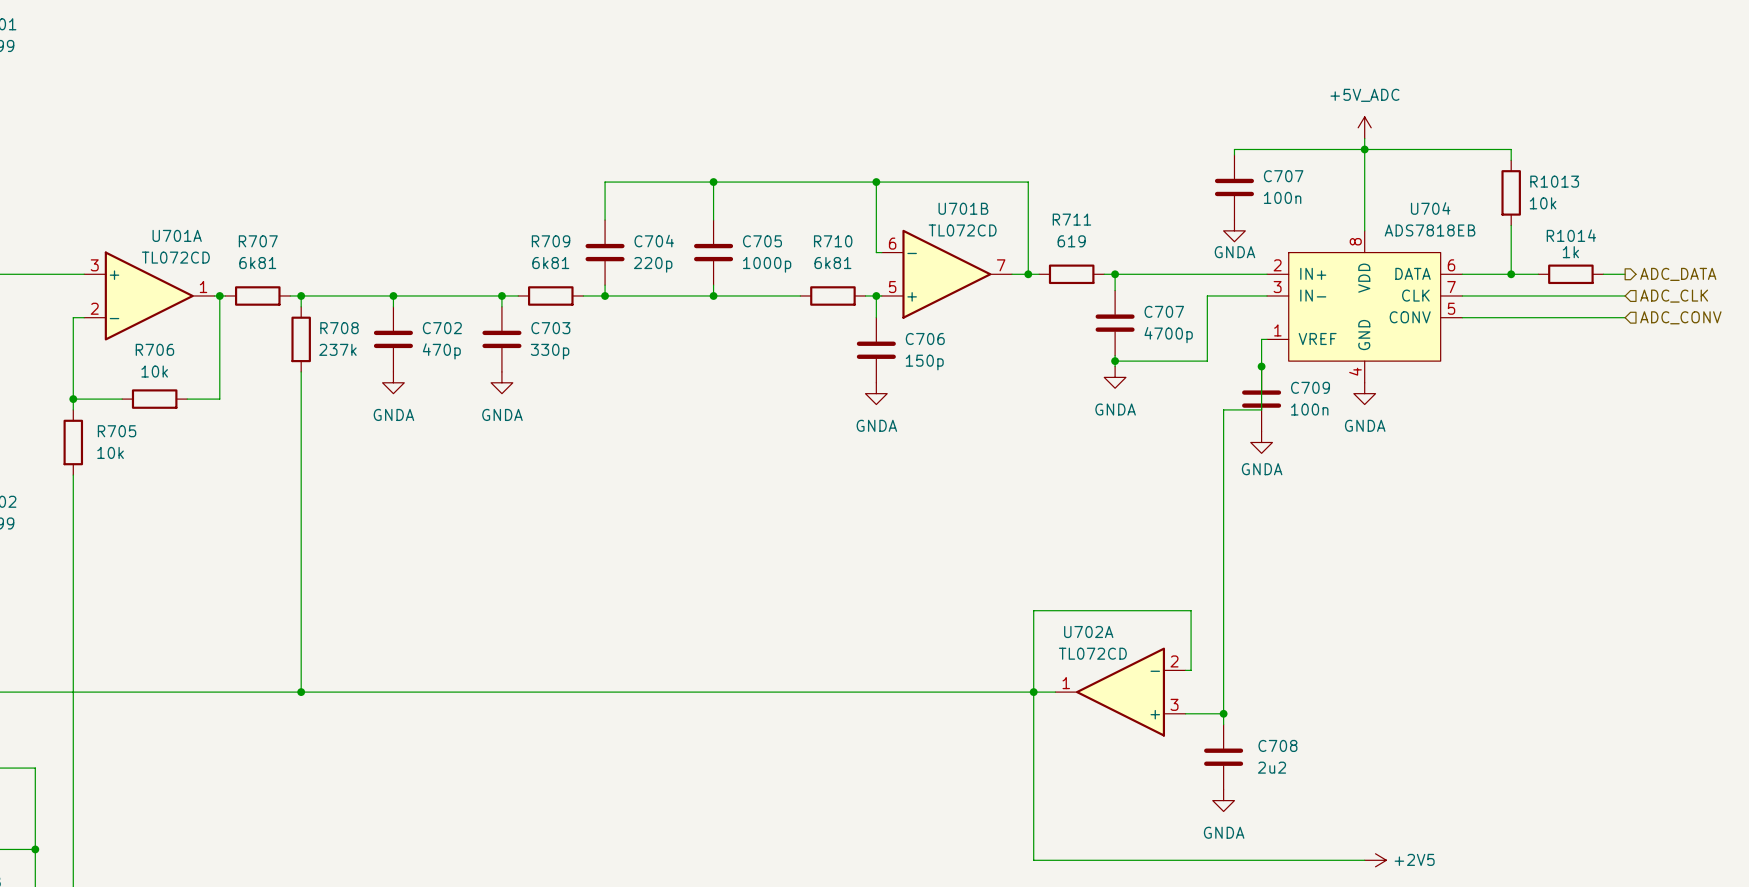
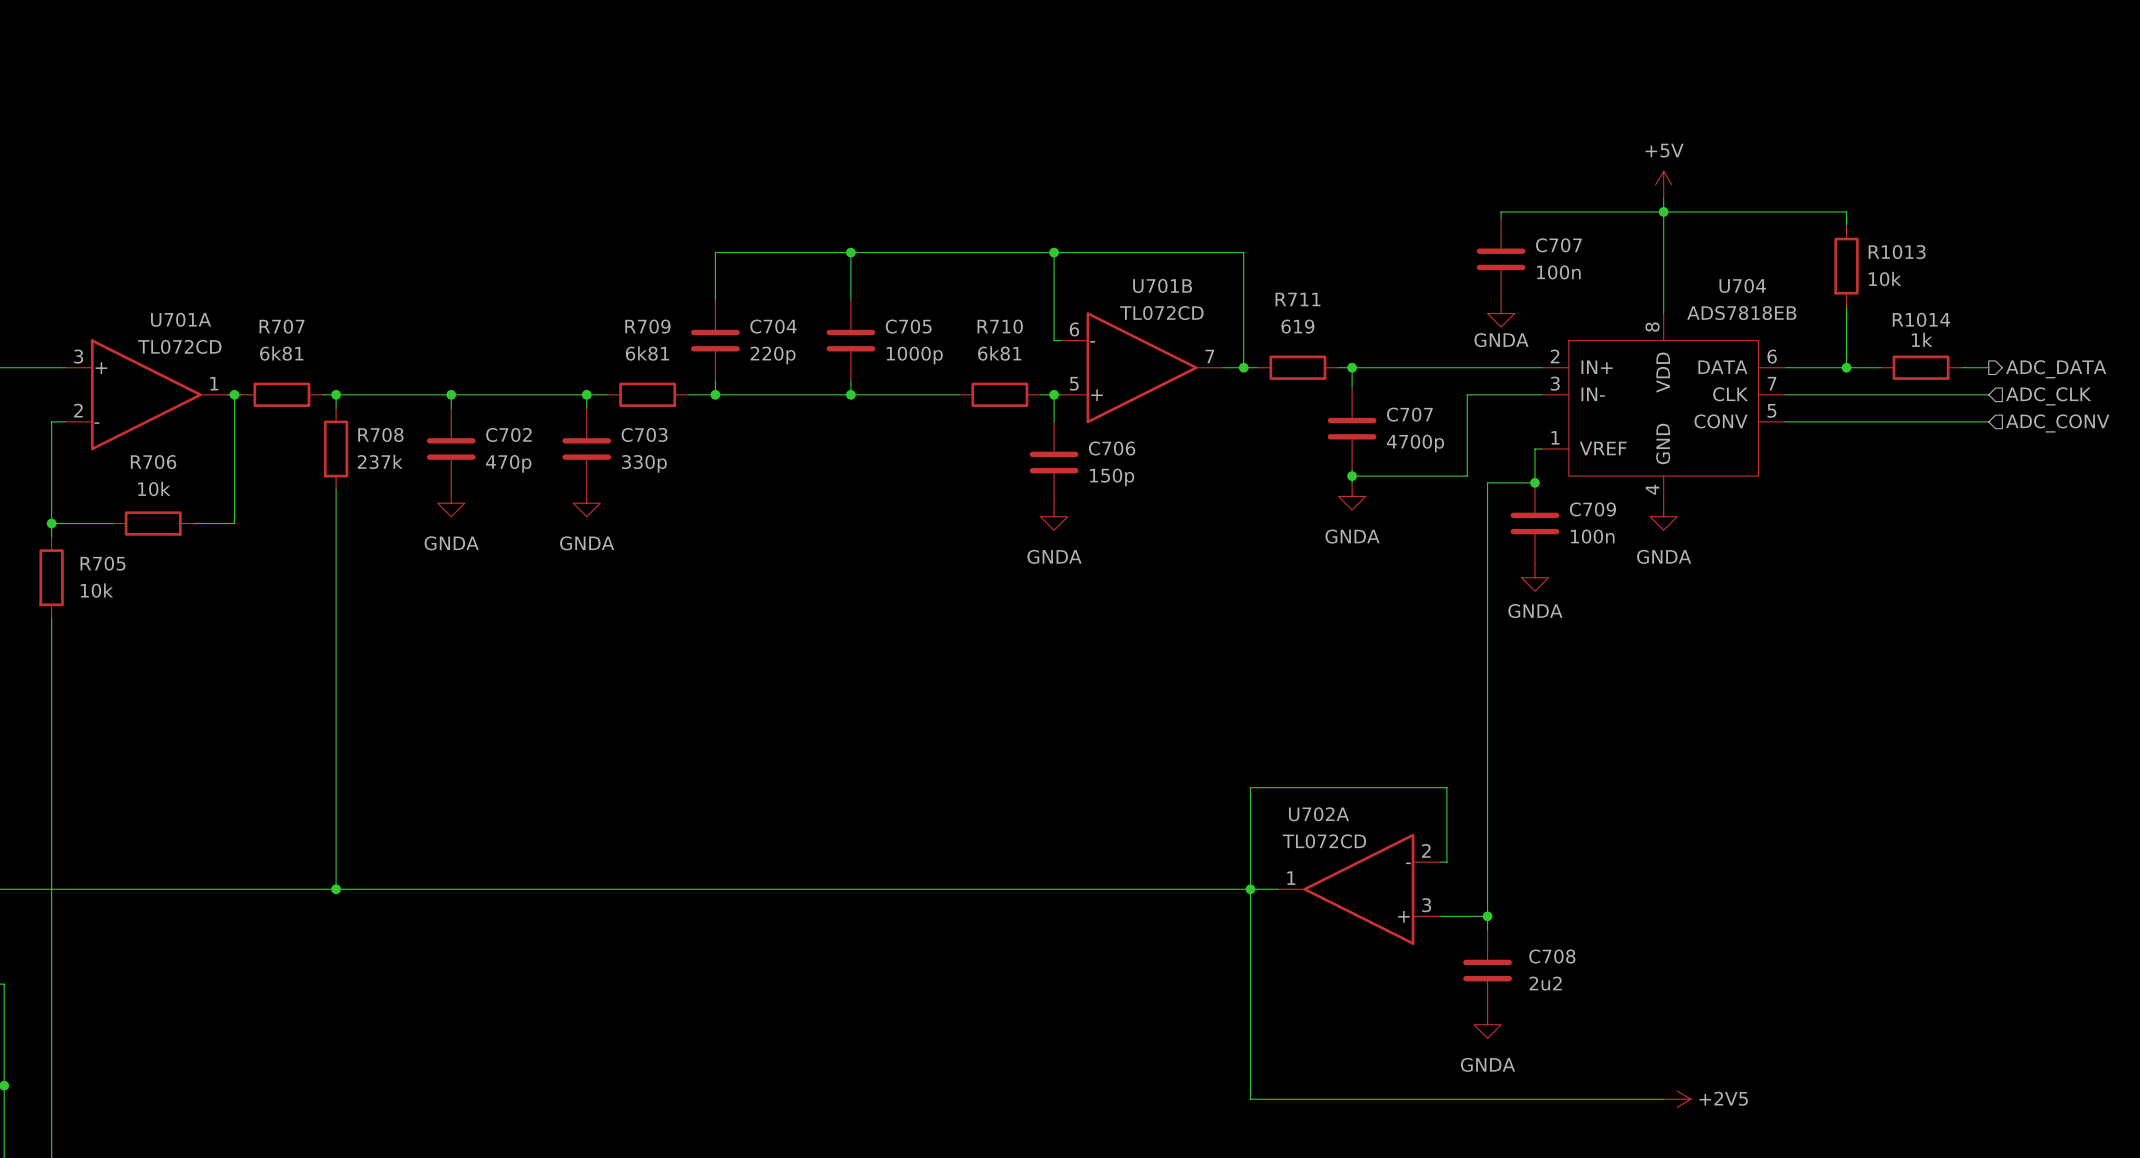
power symbol: +5V_ADC (1364, 127) -> +5V (1663, 184)
wire: (1261, 366) (1261, 409) (1223, 409) -> (1534, 482) (1487, 482) (1487, 537)

